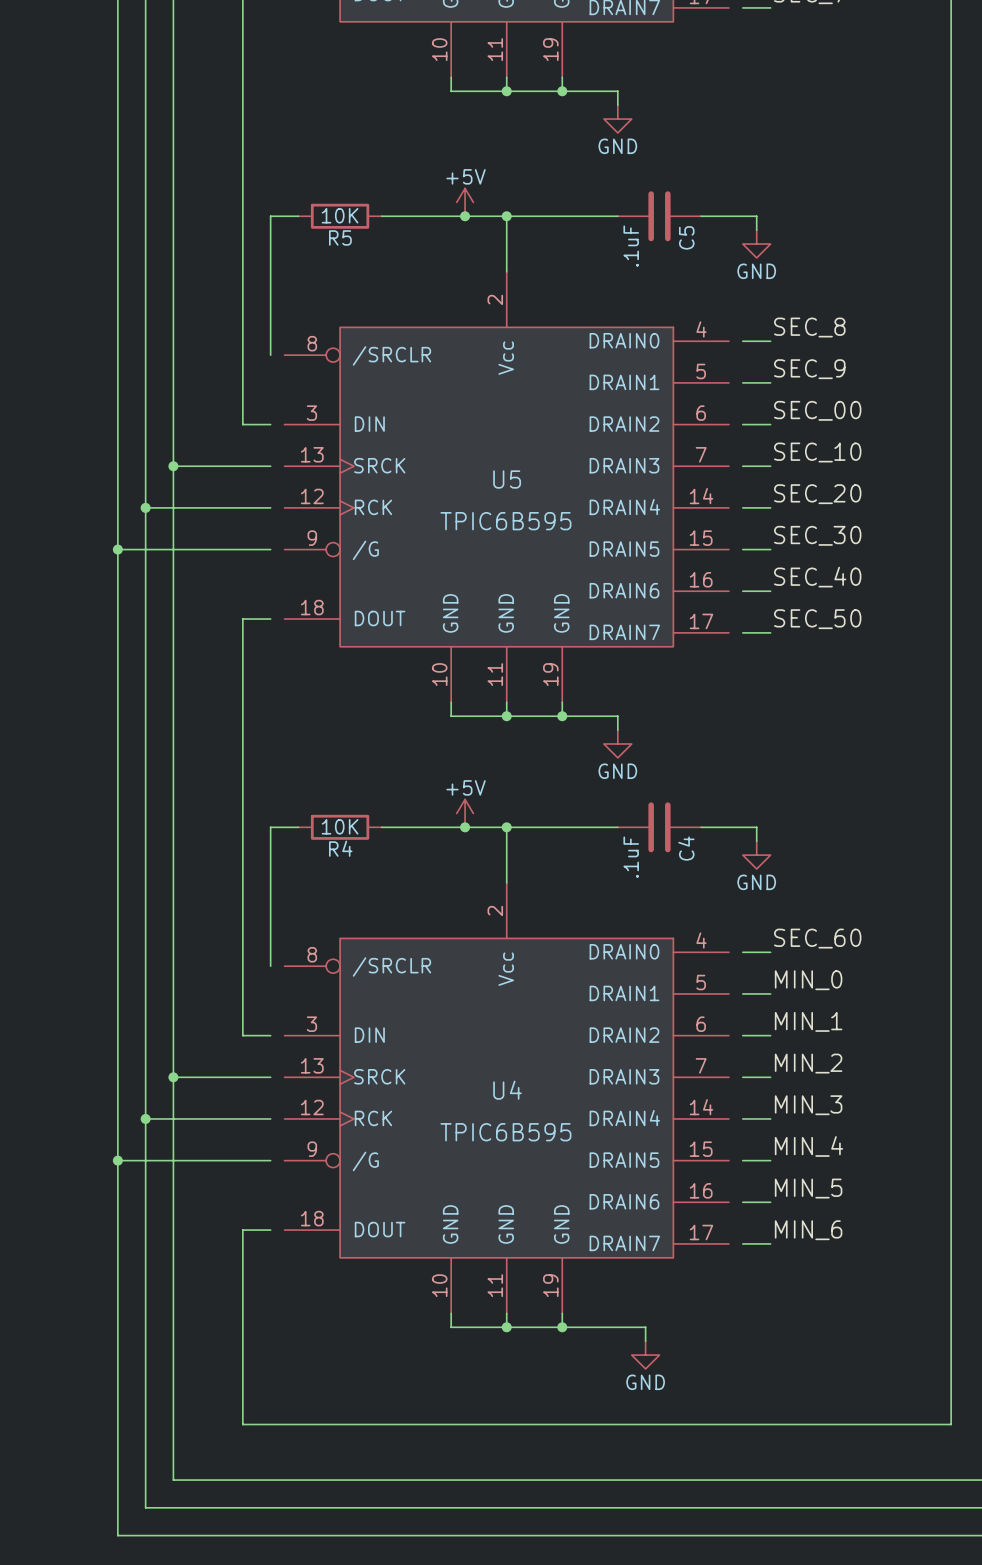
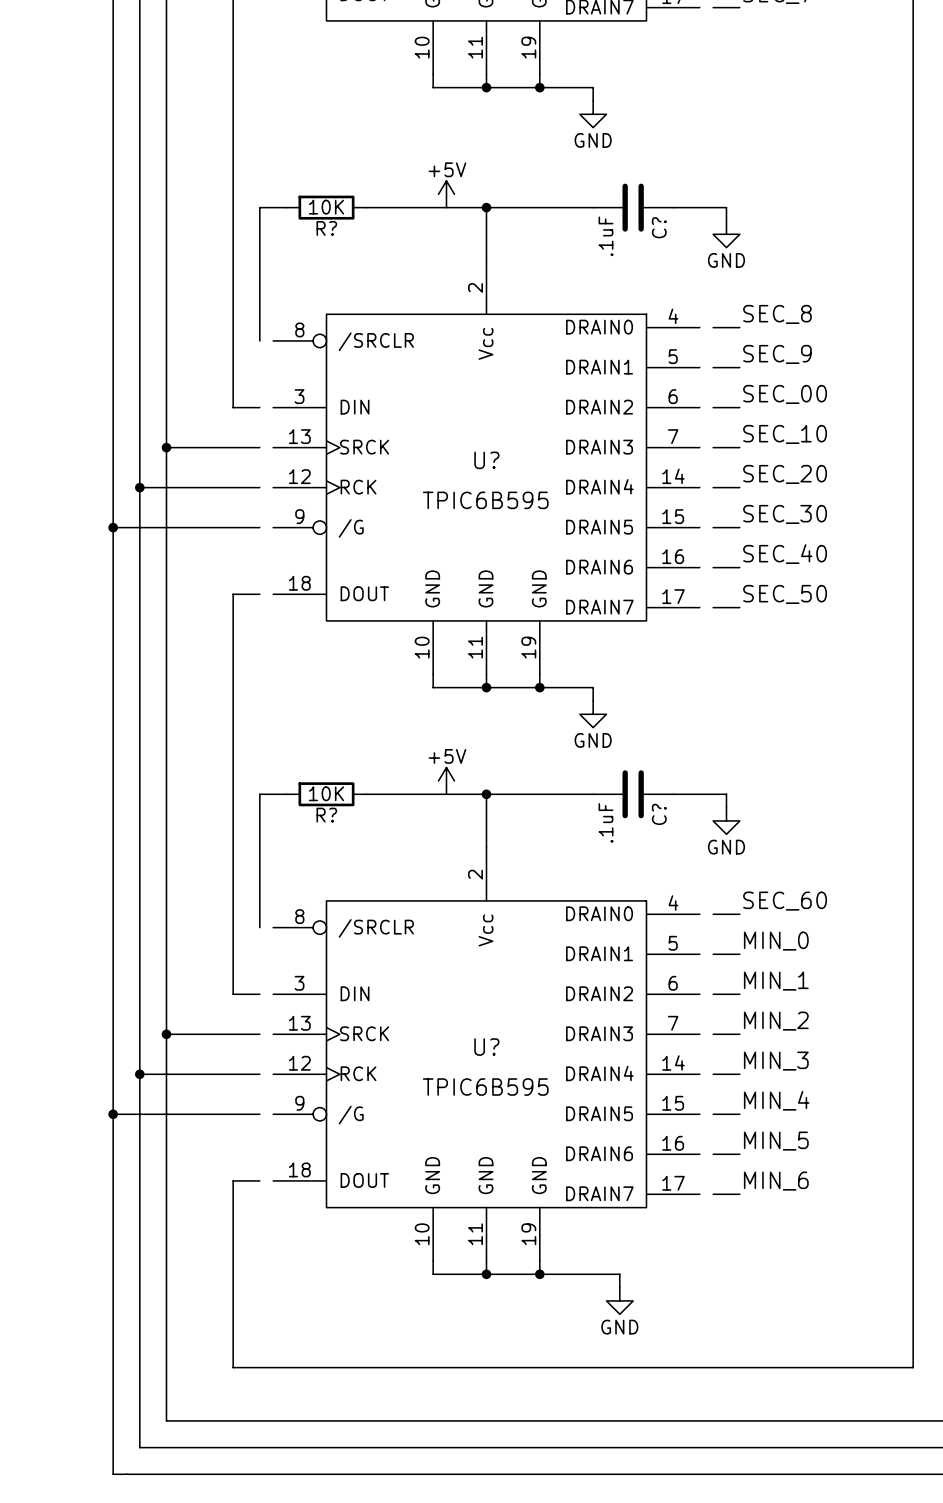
junction: (465, 216) -> none
R5 name: R5 (340, 237) -> R? (326, 228)
C5 name: C5 (686, 237) -> C? (659, 227)
U5 name: U5 (507, 479) -> U? (486, 460)
junction: (465, 827) -> none
R4 name: R4 (340, 848) -> R? (326, 815)
C4 name: C4 (686, 848) -> C? (659, 814)
U4 name: U4 (507, 1090) -> U? (486, 1047)

